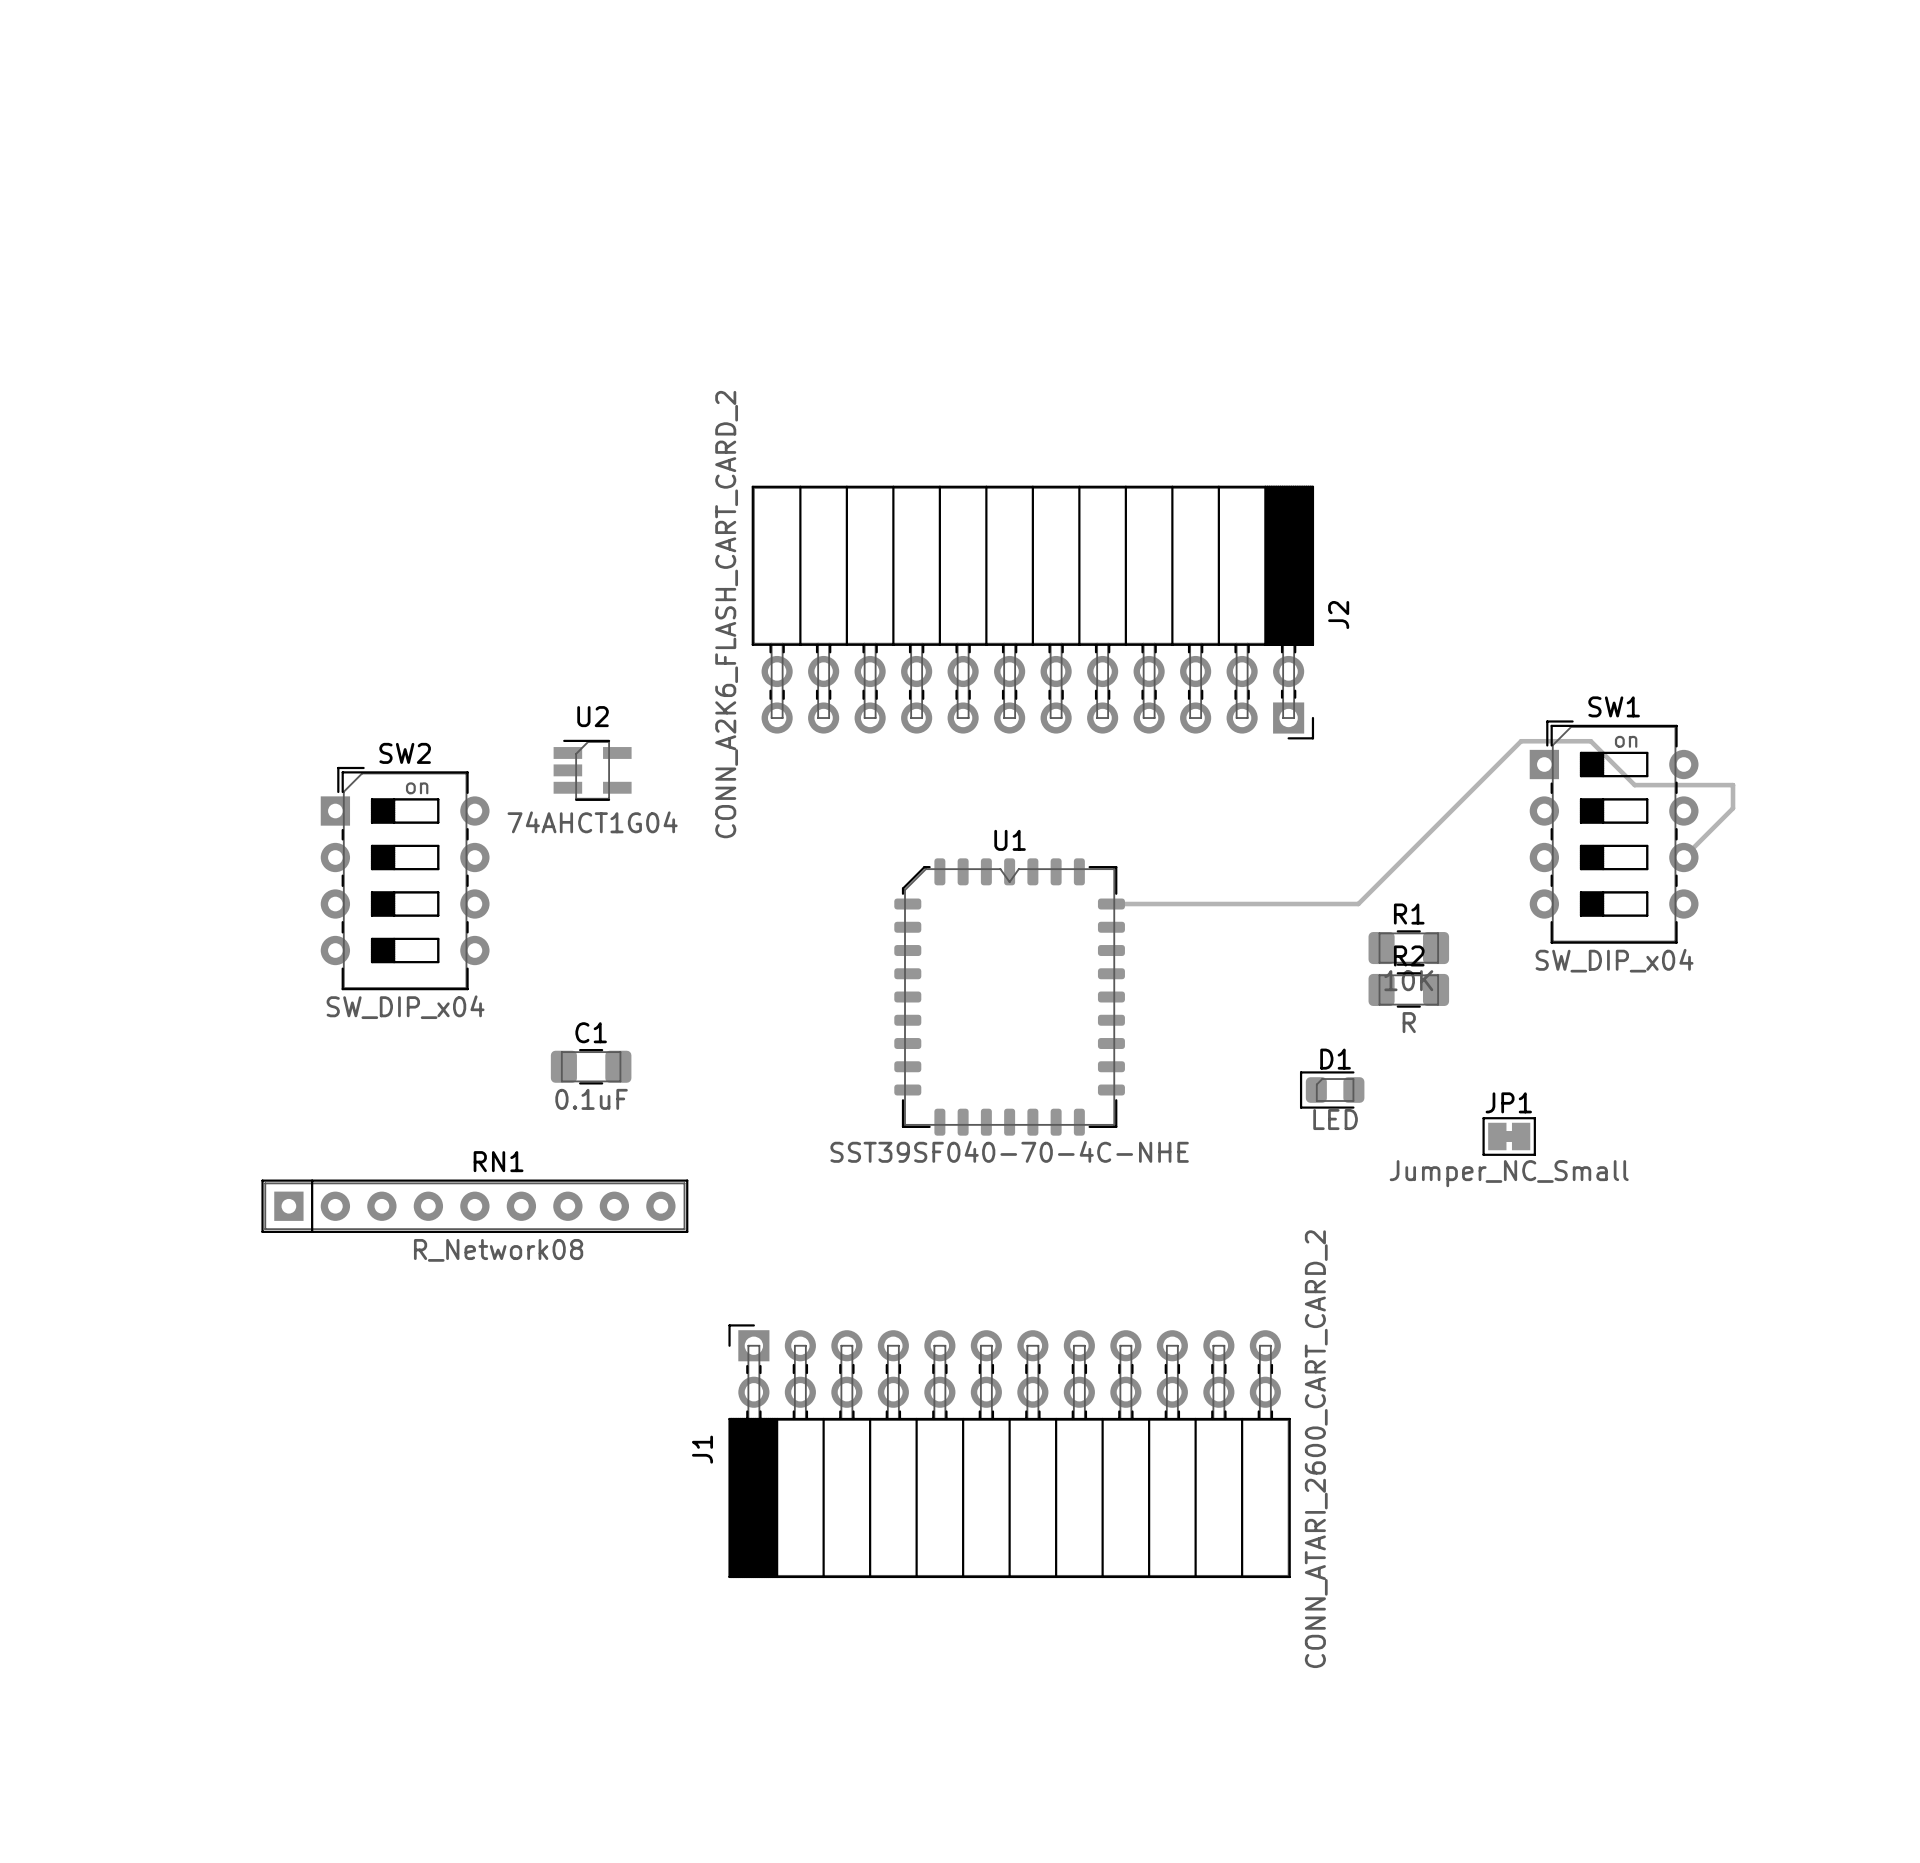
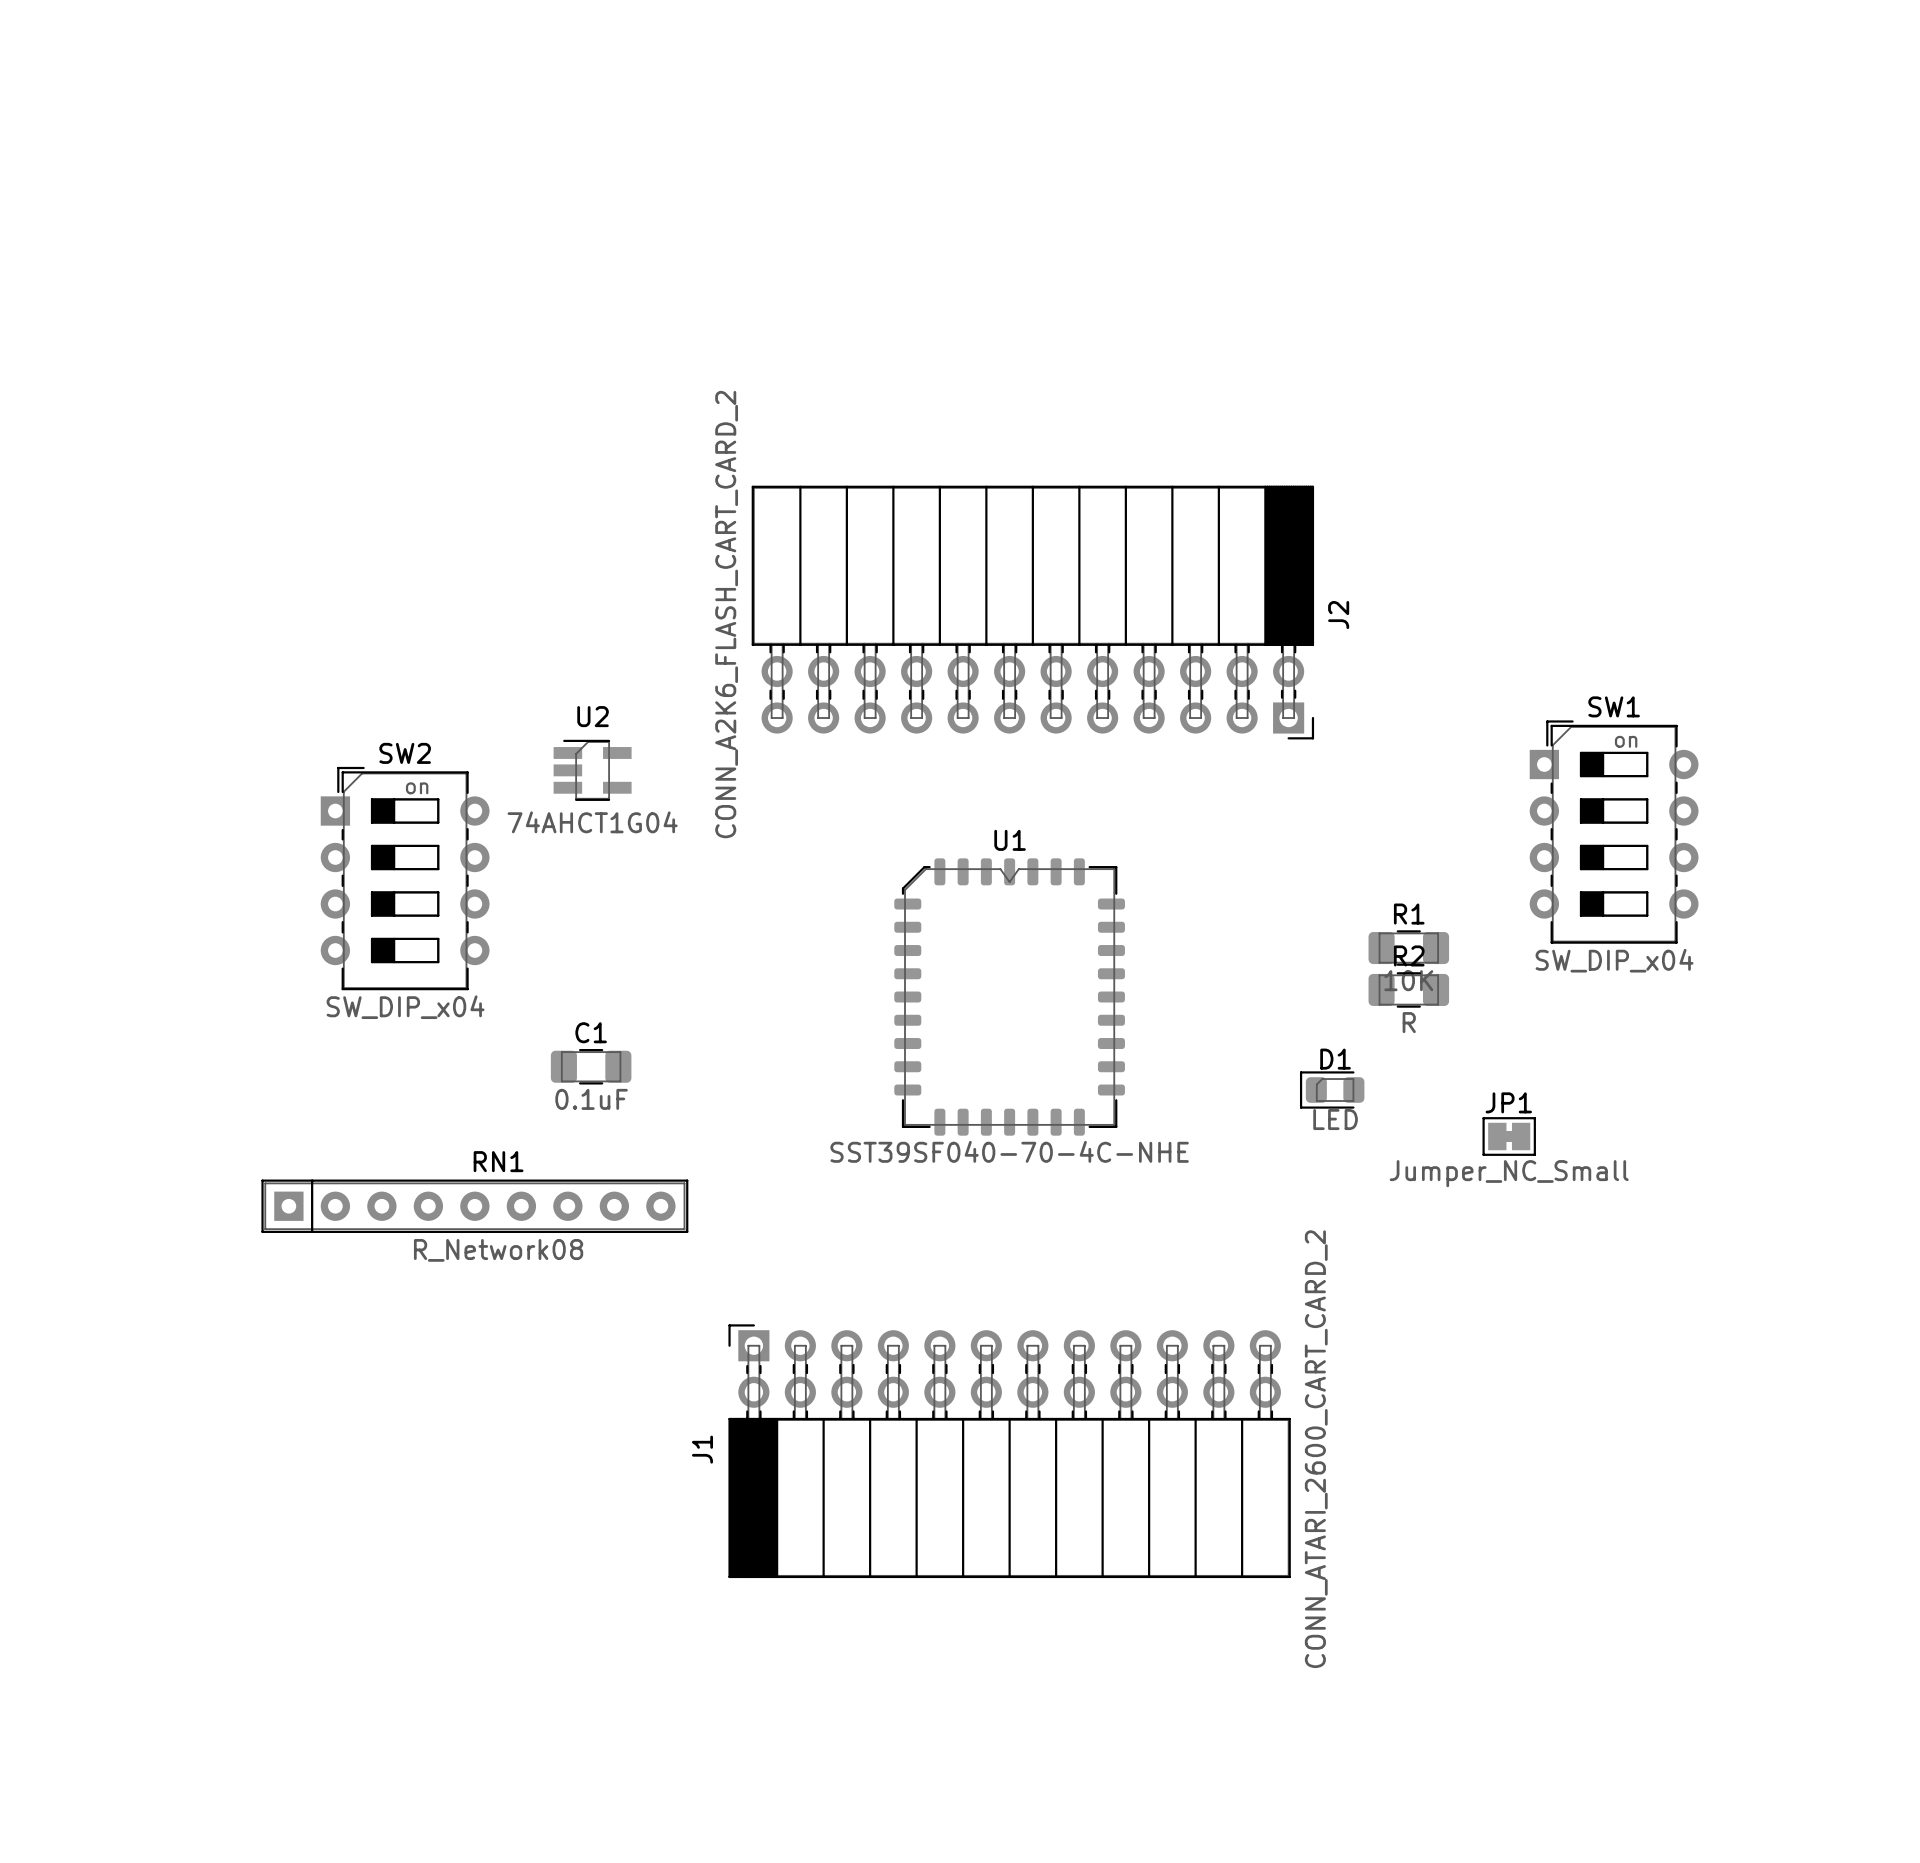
track: (1683, 857) (1733, 808) (1733, 785) (1634, 785) (1590, 741) (1521, 741) (1358, 904) (1111, 904) -> none

